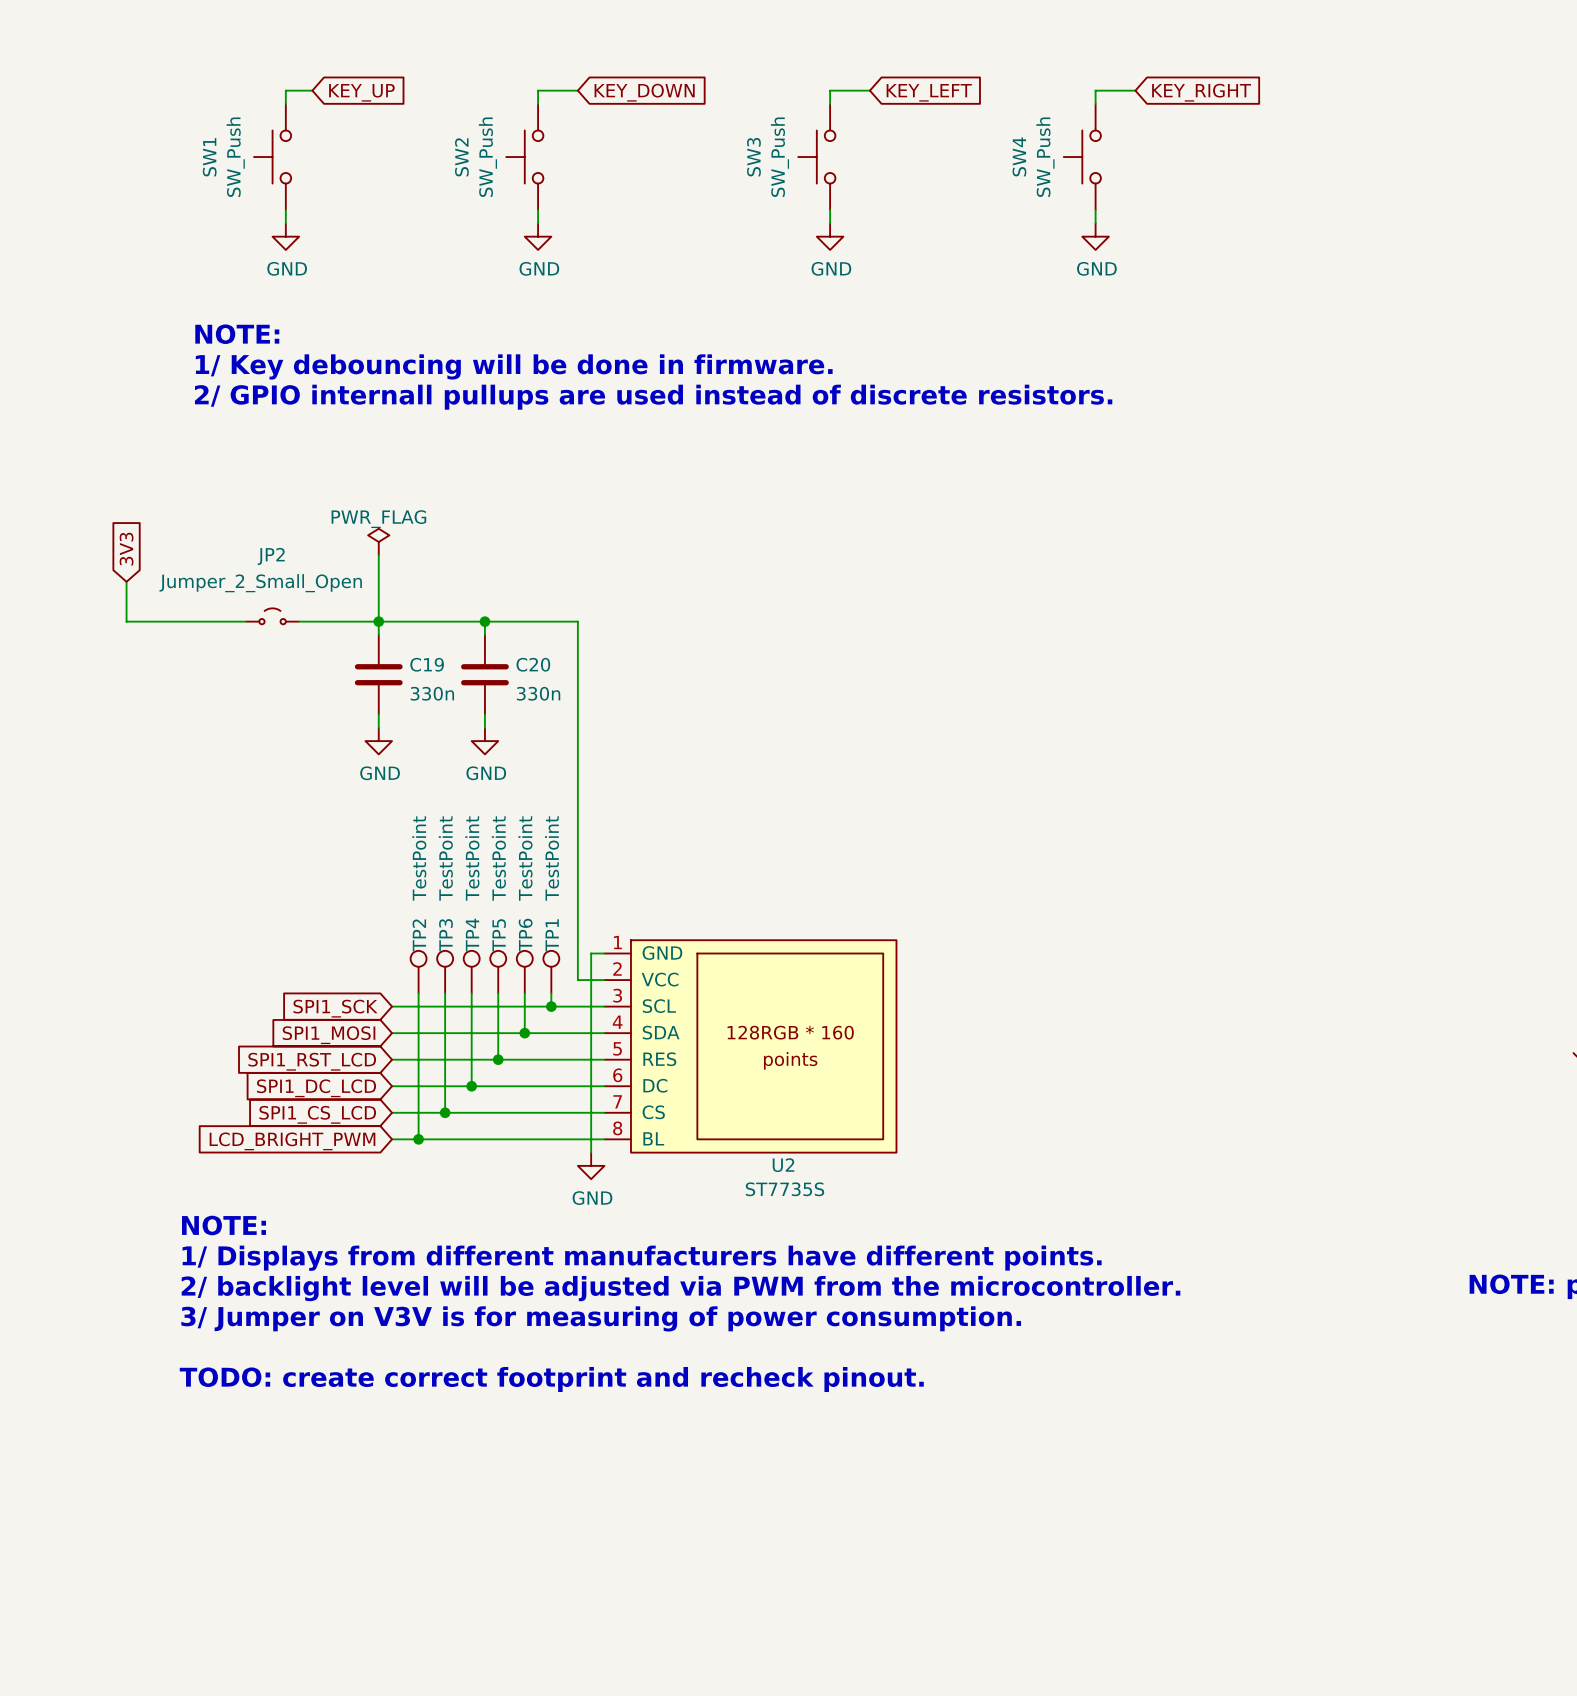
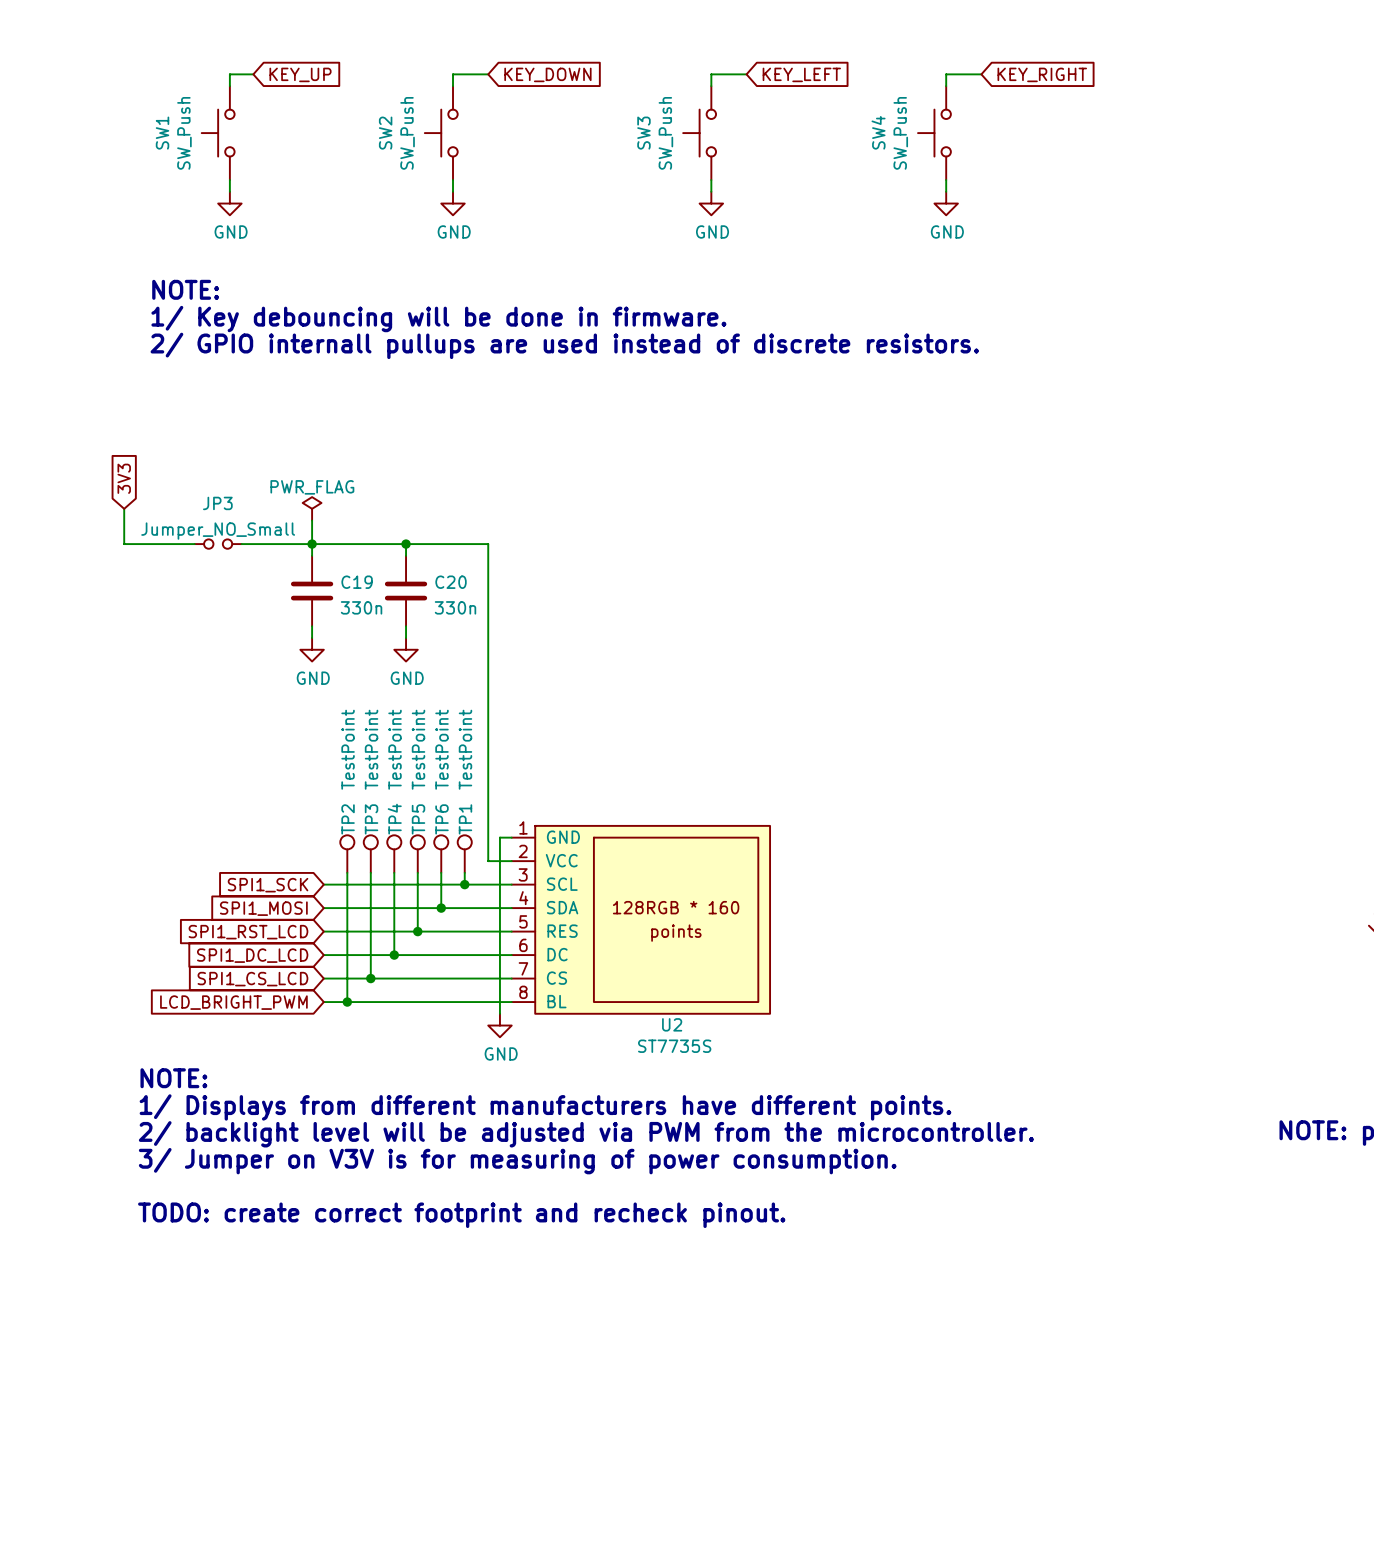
power symbol position: PWR_FLAG (378, 541) -> PWR_FLAG (312, 508)
global label position: 3V3 (126, 549) -> 3V3 (124, 478)
wire: (378, 555) (378, 595) -> none
wire: (126, 581) (126, 621) (166, 621) -> (124, 508) (124, 544)
JP2: Jumper_2_Small_Open (272, 616) -> none
JP3: none -> Jumper_NO_Small (218, 544)

